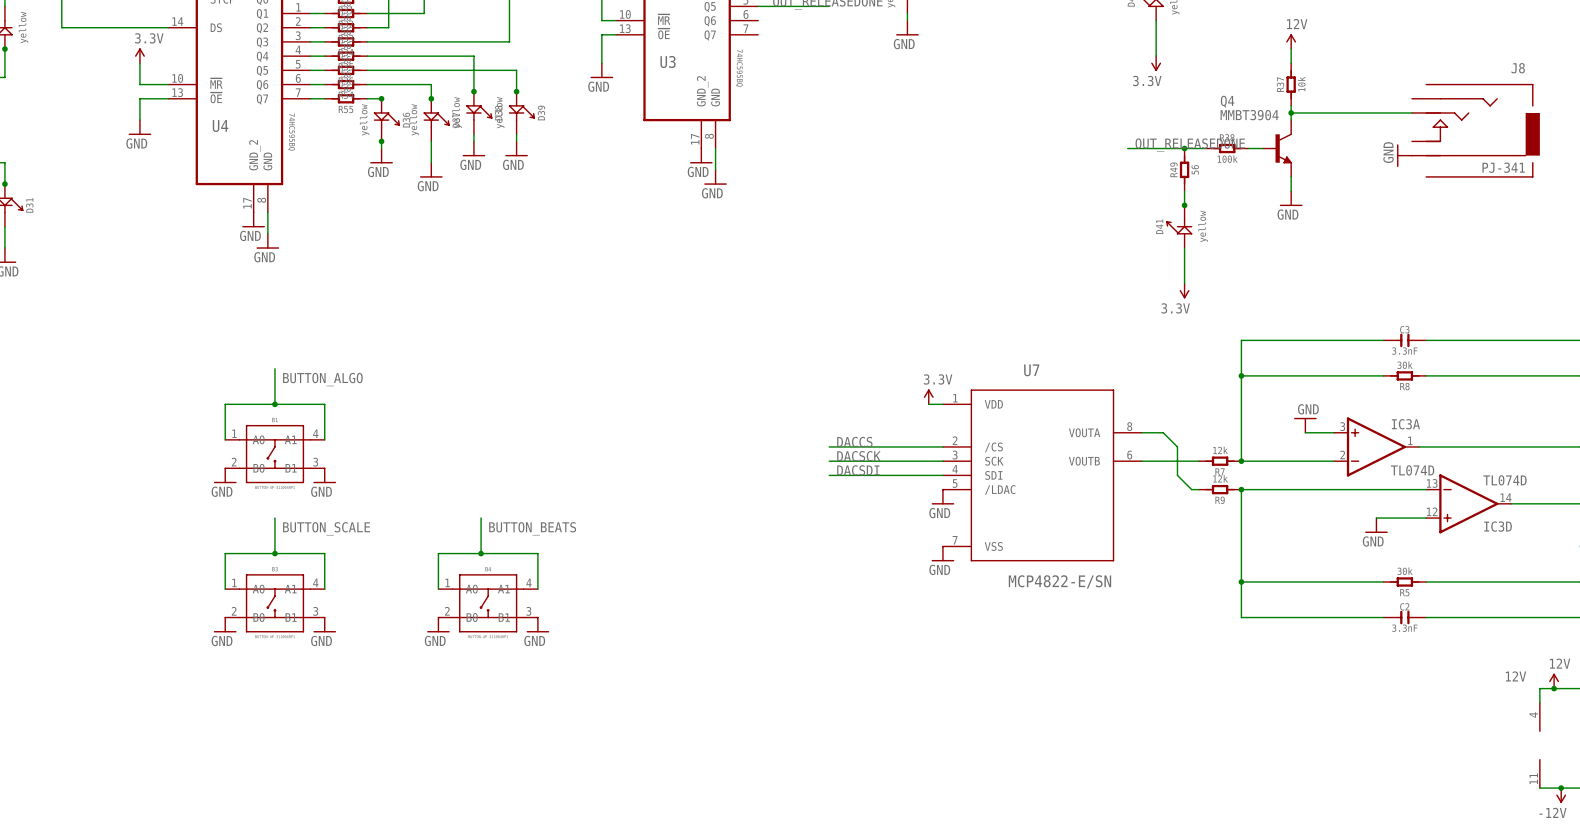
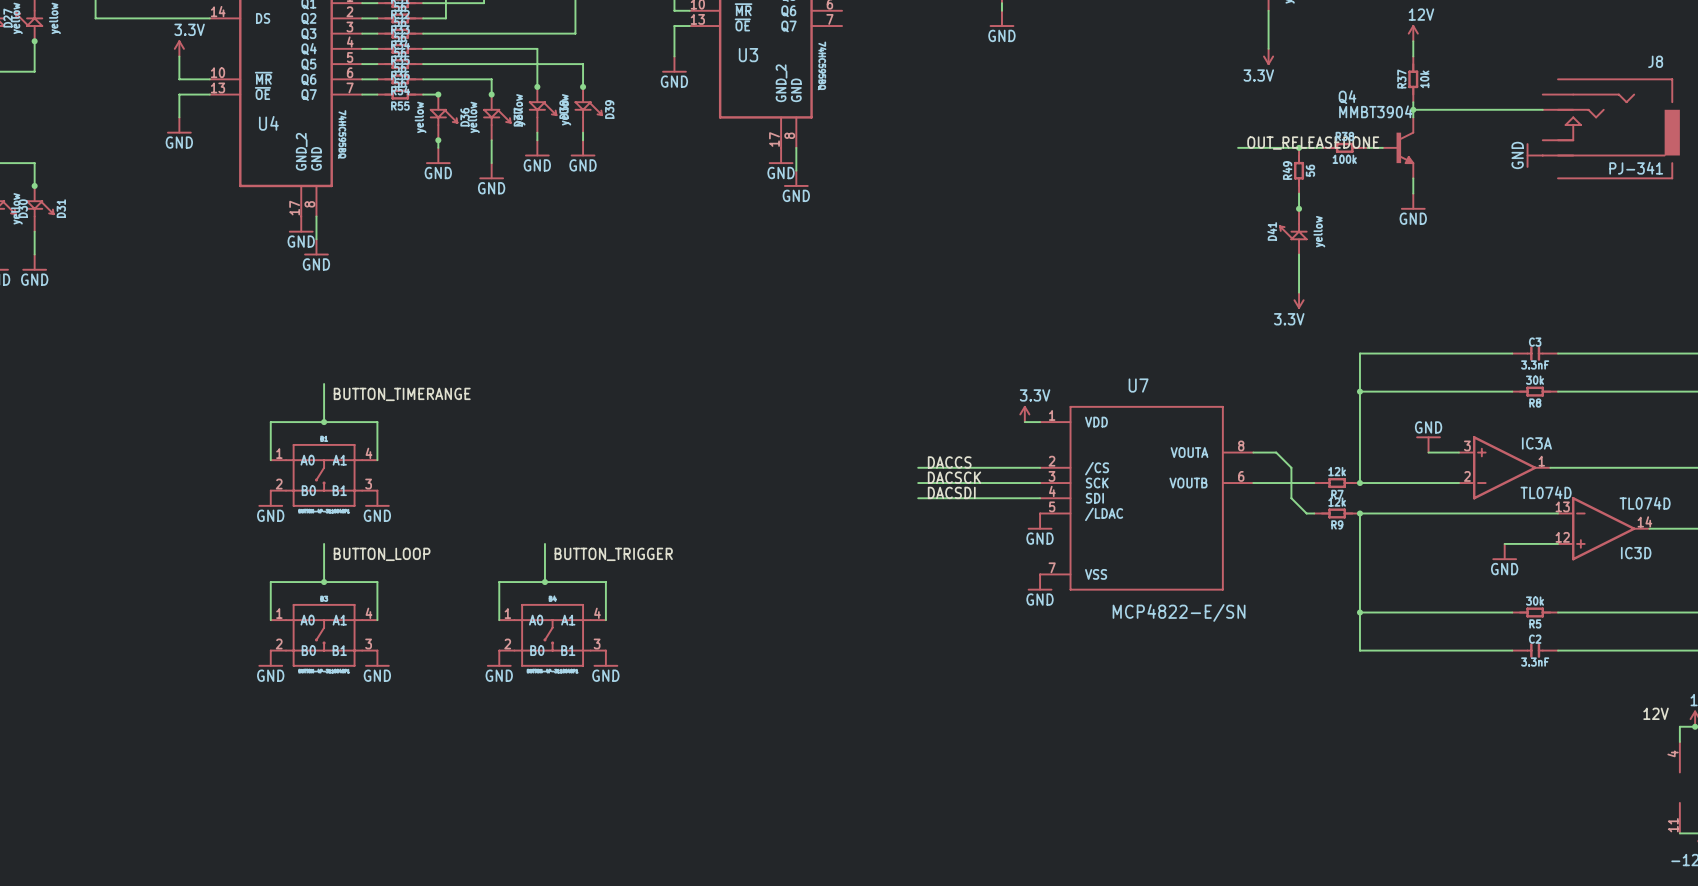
label: BUTTON_ALGO (322, 379) -> BUTTON_TIMERANGE (402, 394)
label: BUTTON_SCALE (326, 528) -> BUTTON_LOOP (382, 554)
label: BUTTON_BEATS (532, 528) -> BUTTON_TRIGGER (613, 554)

